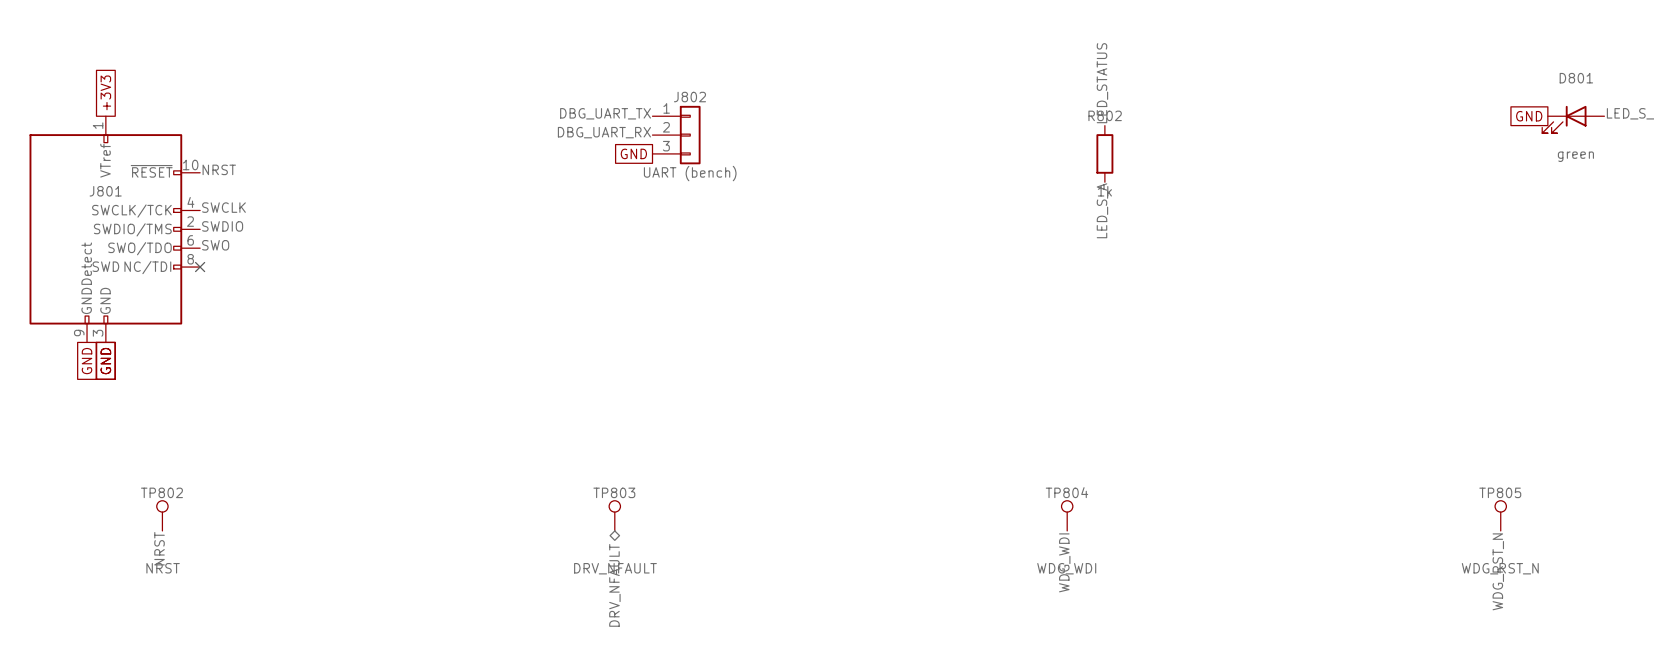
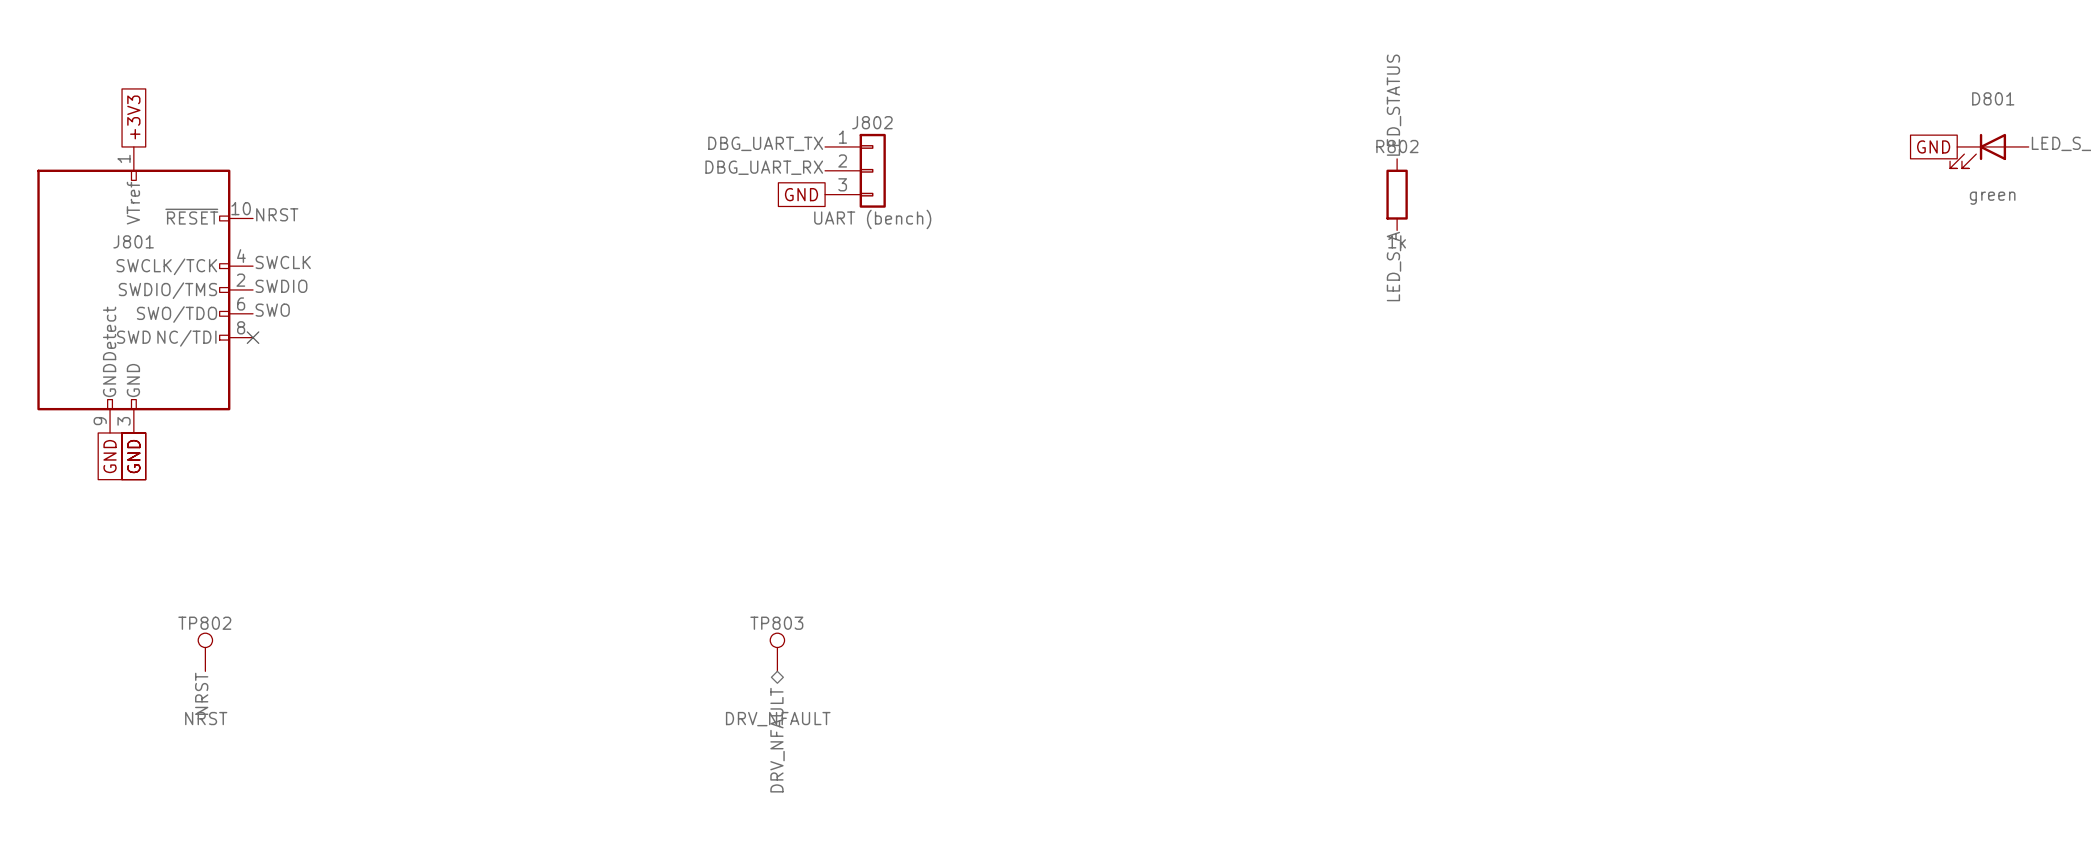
TP804: WDG_WDI (1067, 515) -> none
TP805: WDG_RST_N (1500, 515) -> none
label: WDG_WDI (1064, 562) -> none
label: WDG_RST_N (1498, 571) -> none

